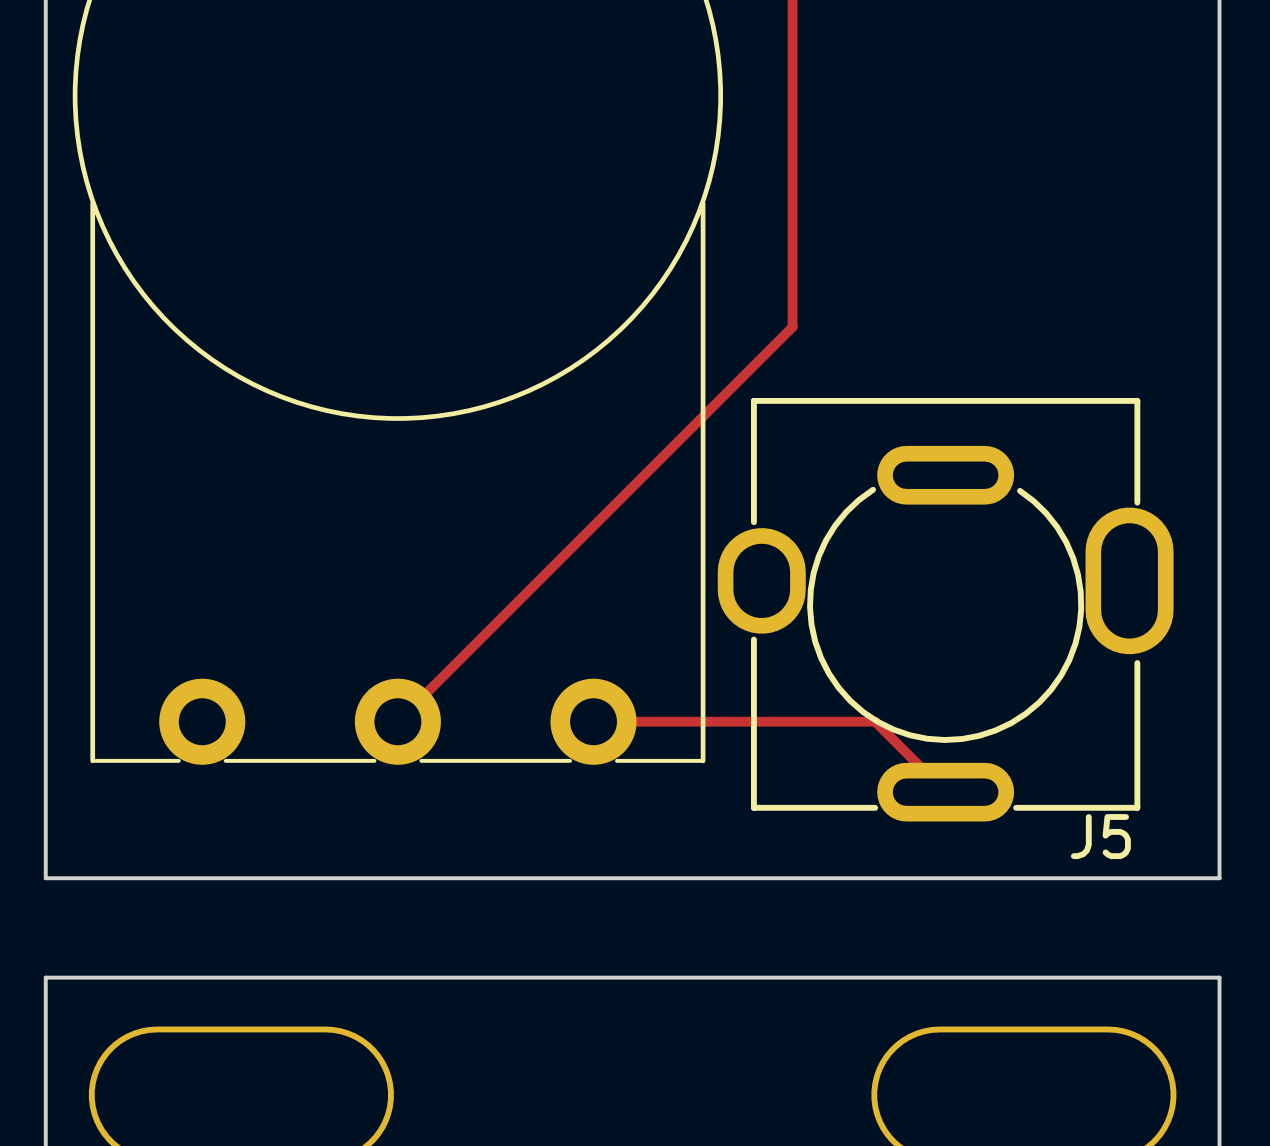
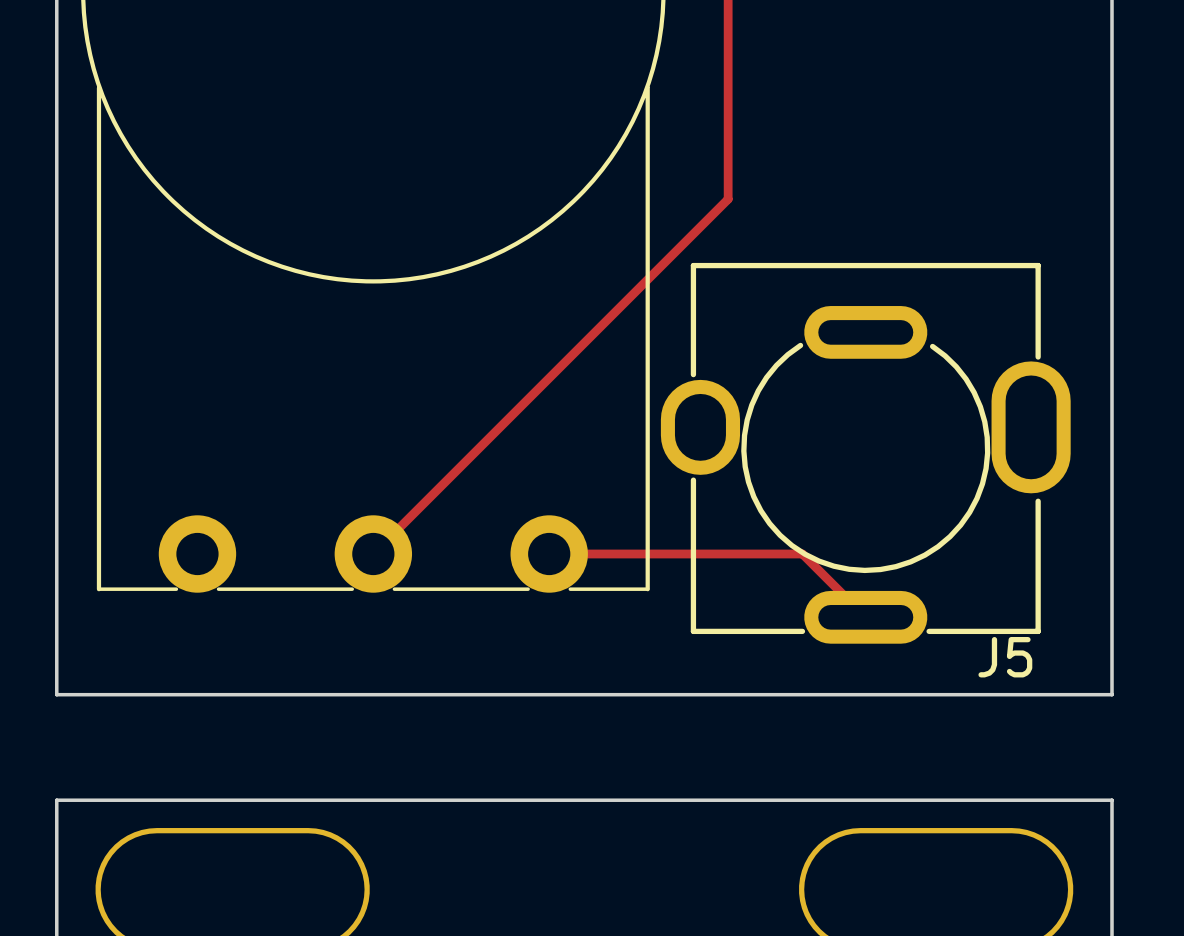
board edge: (45, 995) (45, 977) (1219, 977) (1219, 995) -> (56, 800) (1112, 800)

